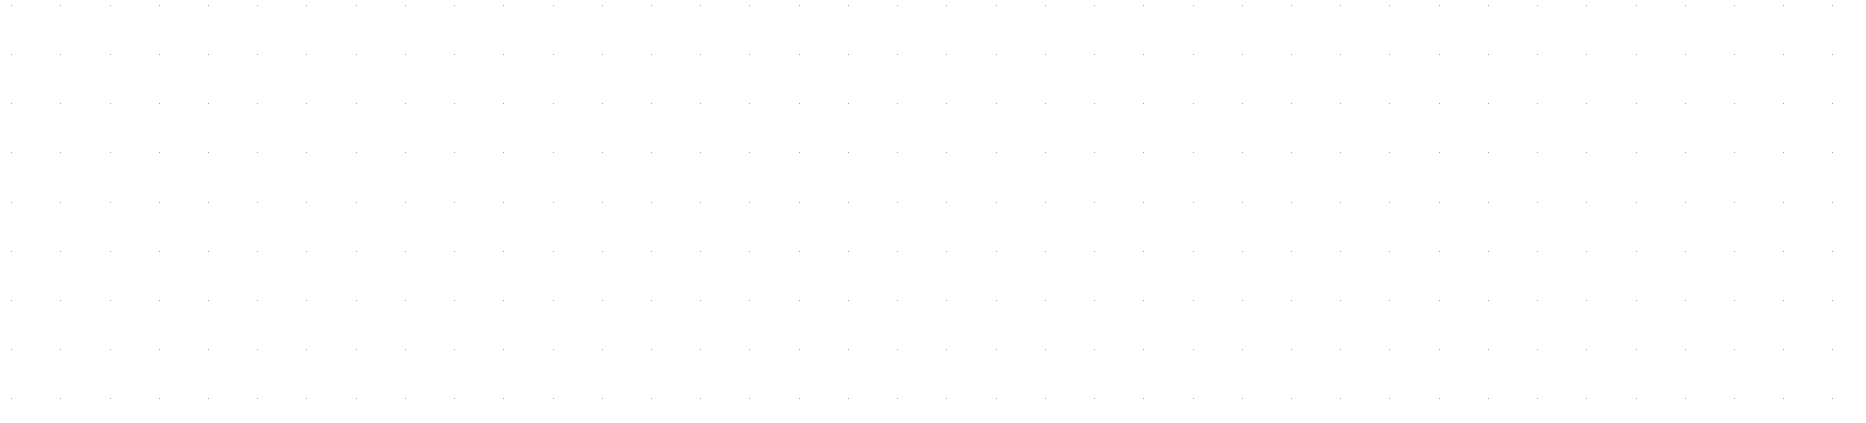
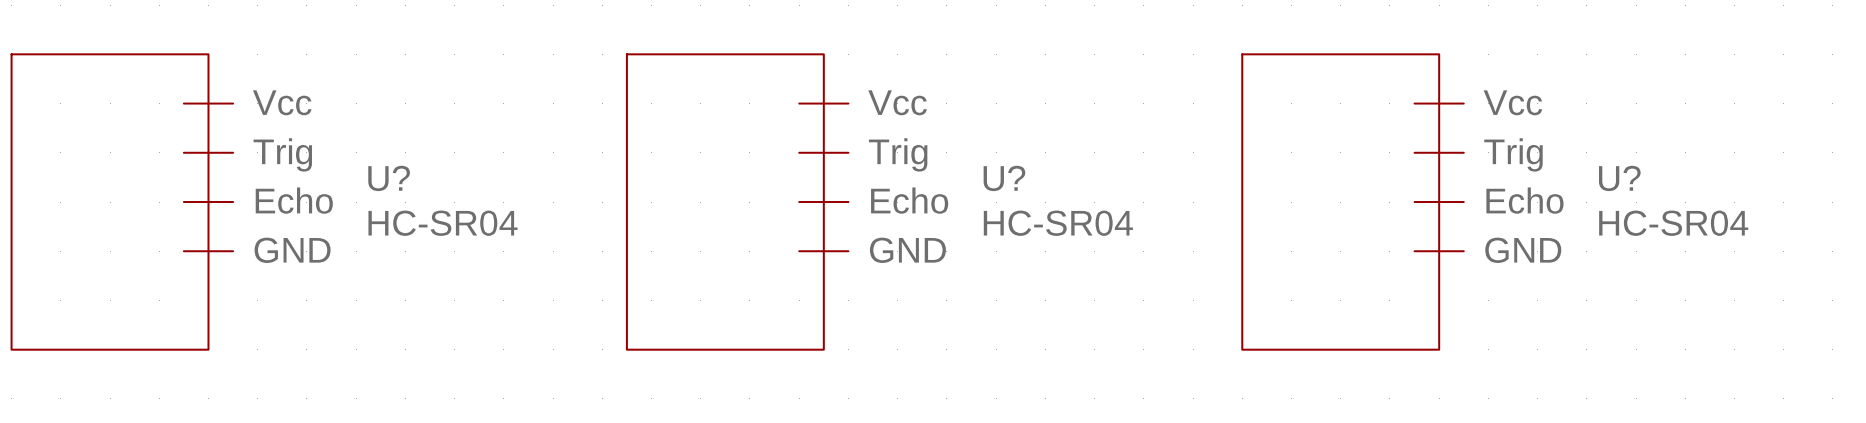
U?: none -> HC-SR04 (122, 202)
U?: none -> HC-SR04 (737, 202)
U?: none -> HC-SR04 (1353, 202)

